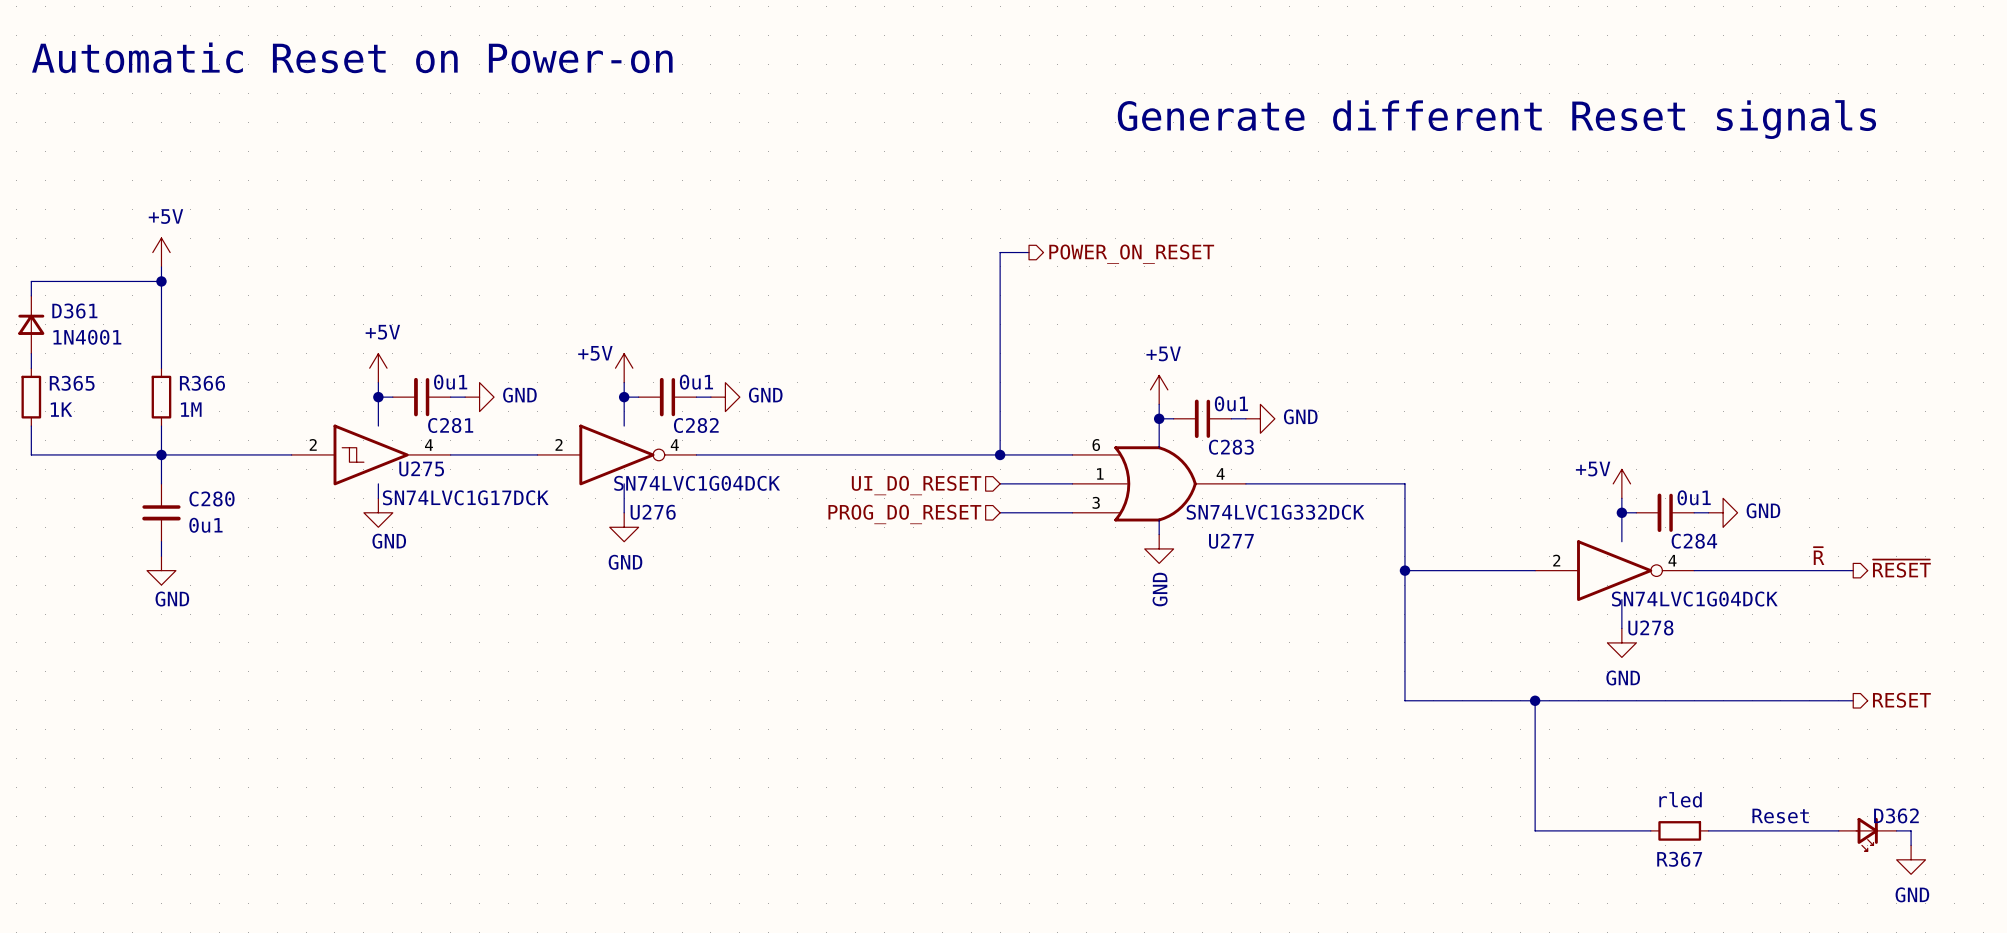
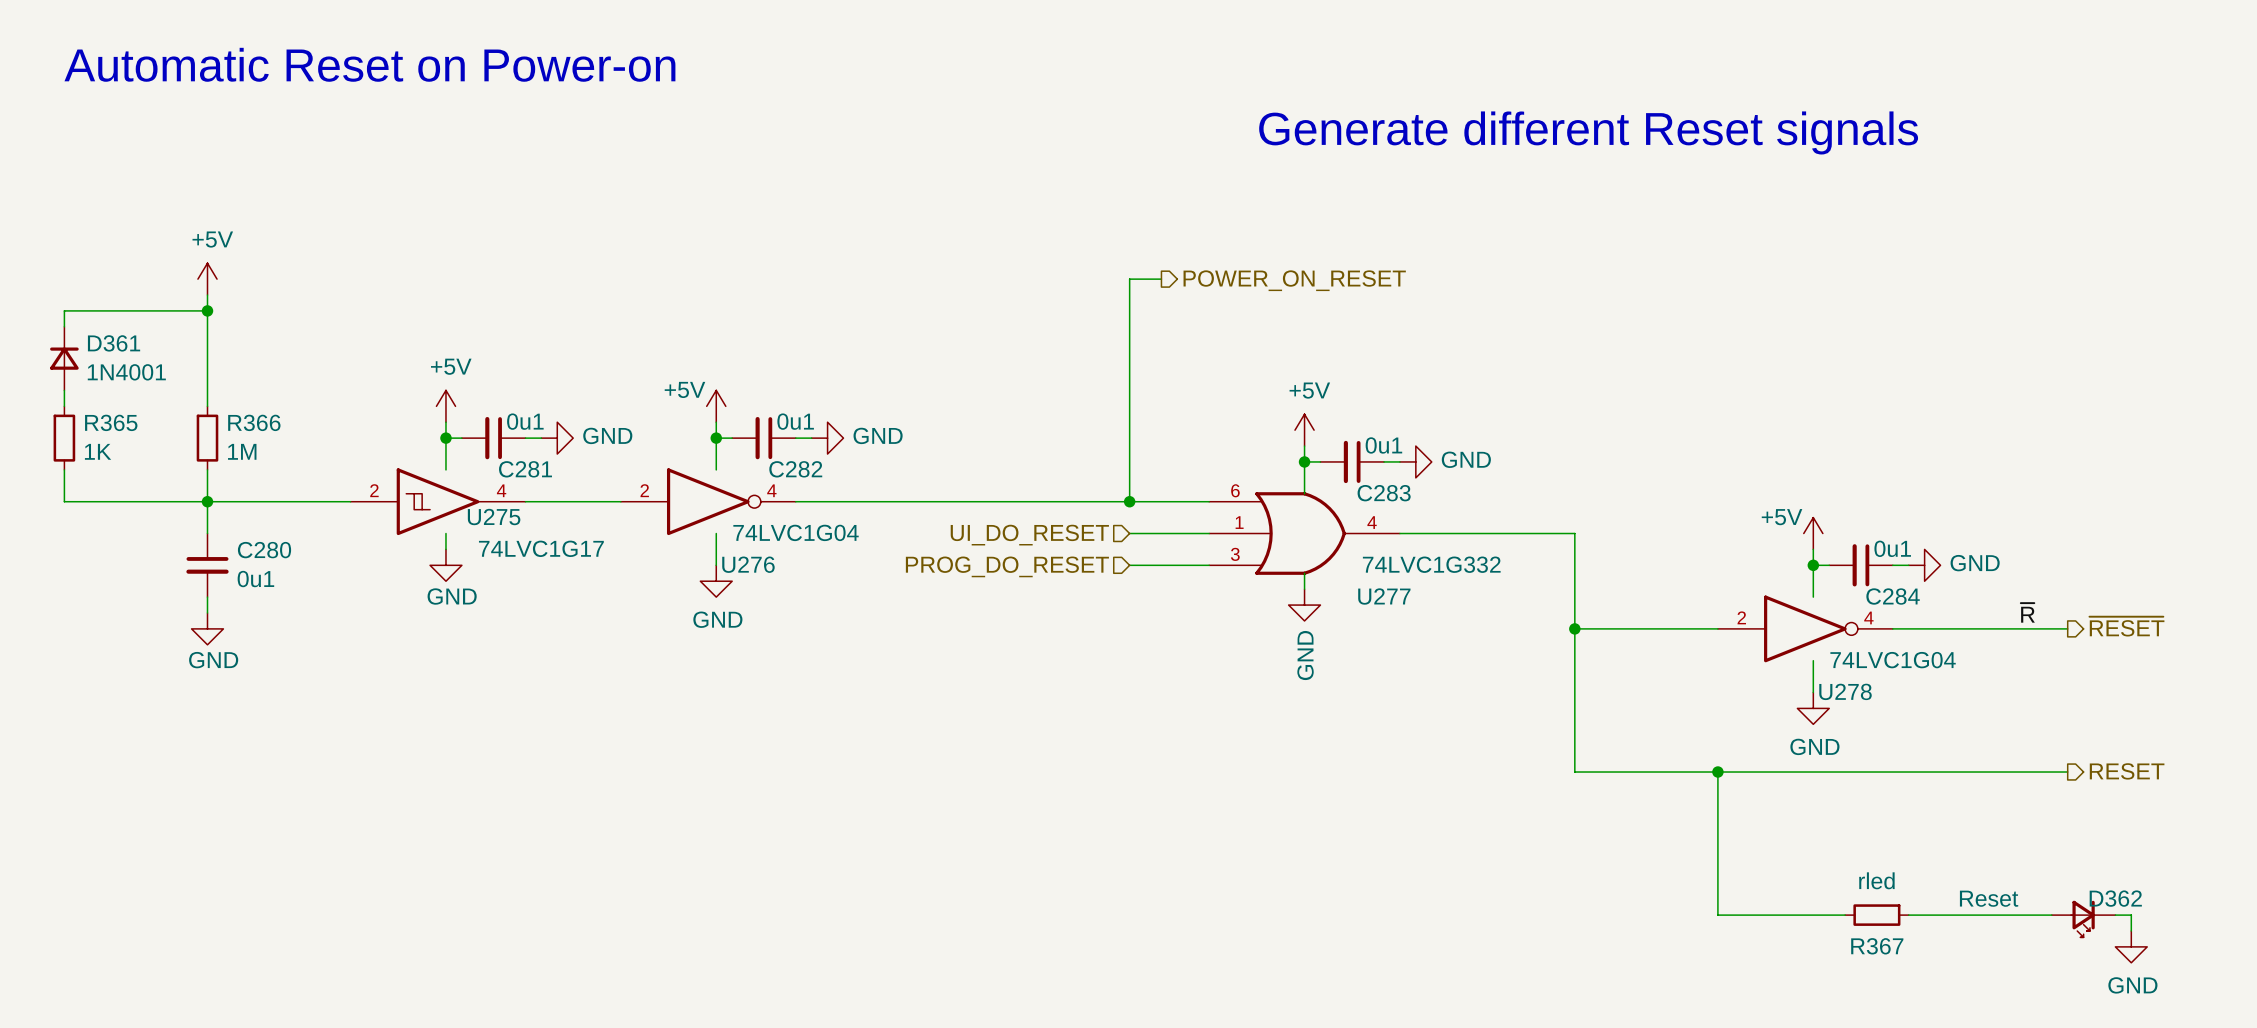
U276 value: SN74LVC1G04DCK (697, 483) -> 74LVC1G04 (796, 532)
U275 value: SN74LVC1G17DCK (465, 497) -> 74LVC1G17 (541, 548)
U277 value: SN74LVC1G332DCK (1275, 512) -> 74LVC1G332 (1431, 564)
U278 value: SN74LVC1G04DCK (1694, 599) -> 74LVC1G04 (1893, 660)

